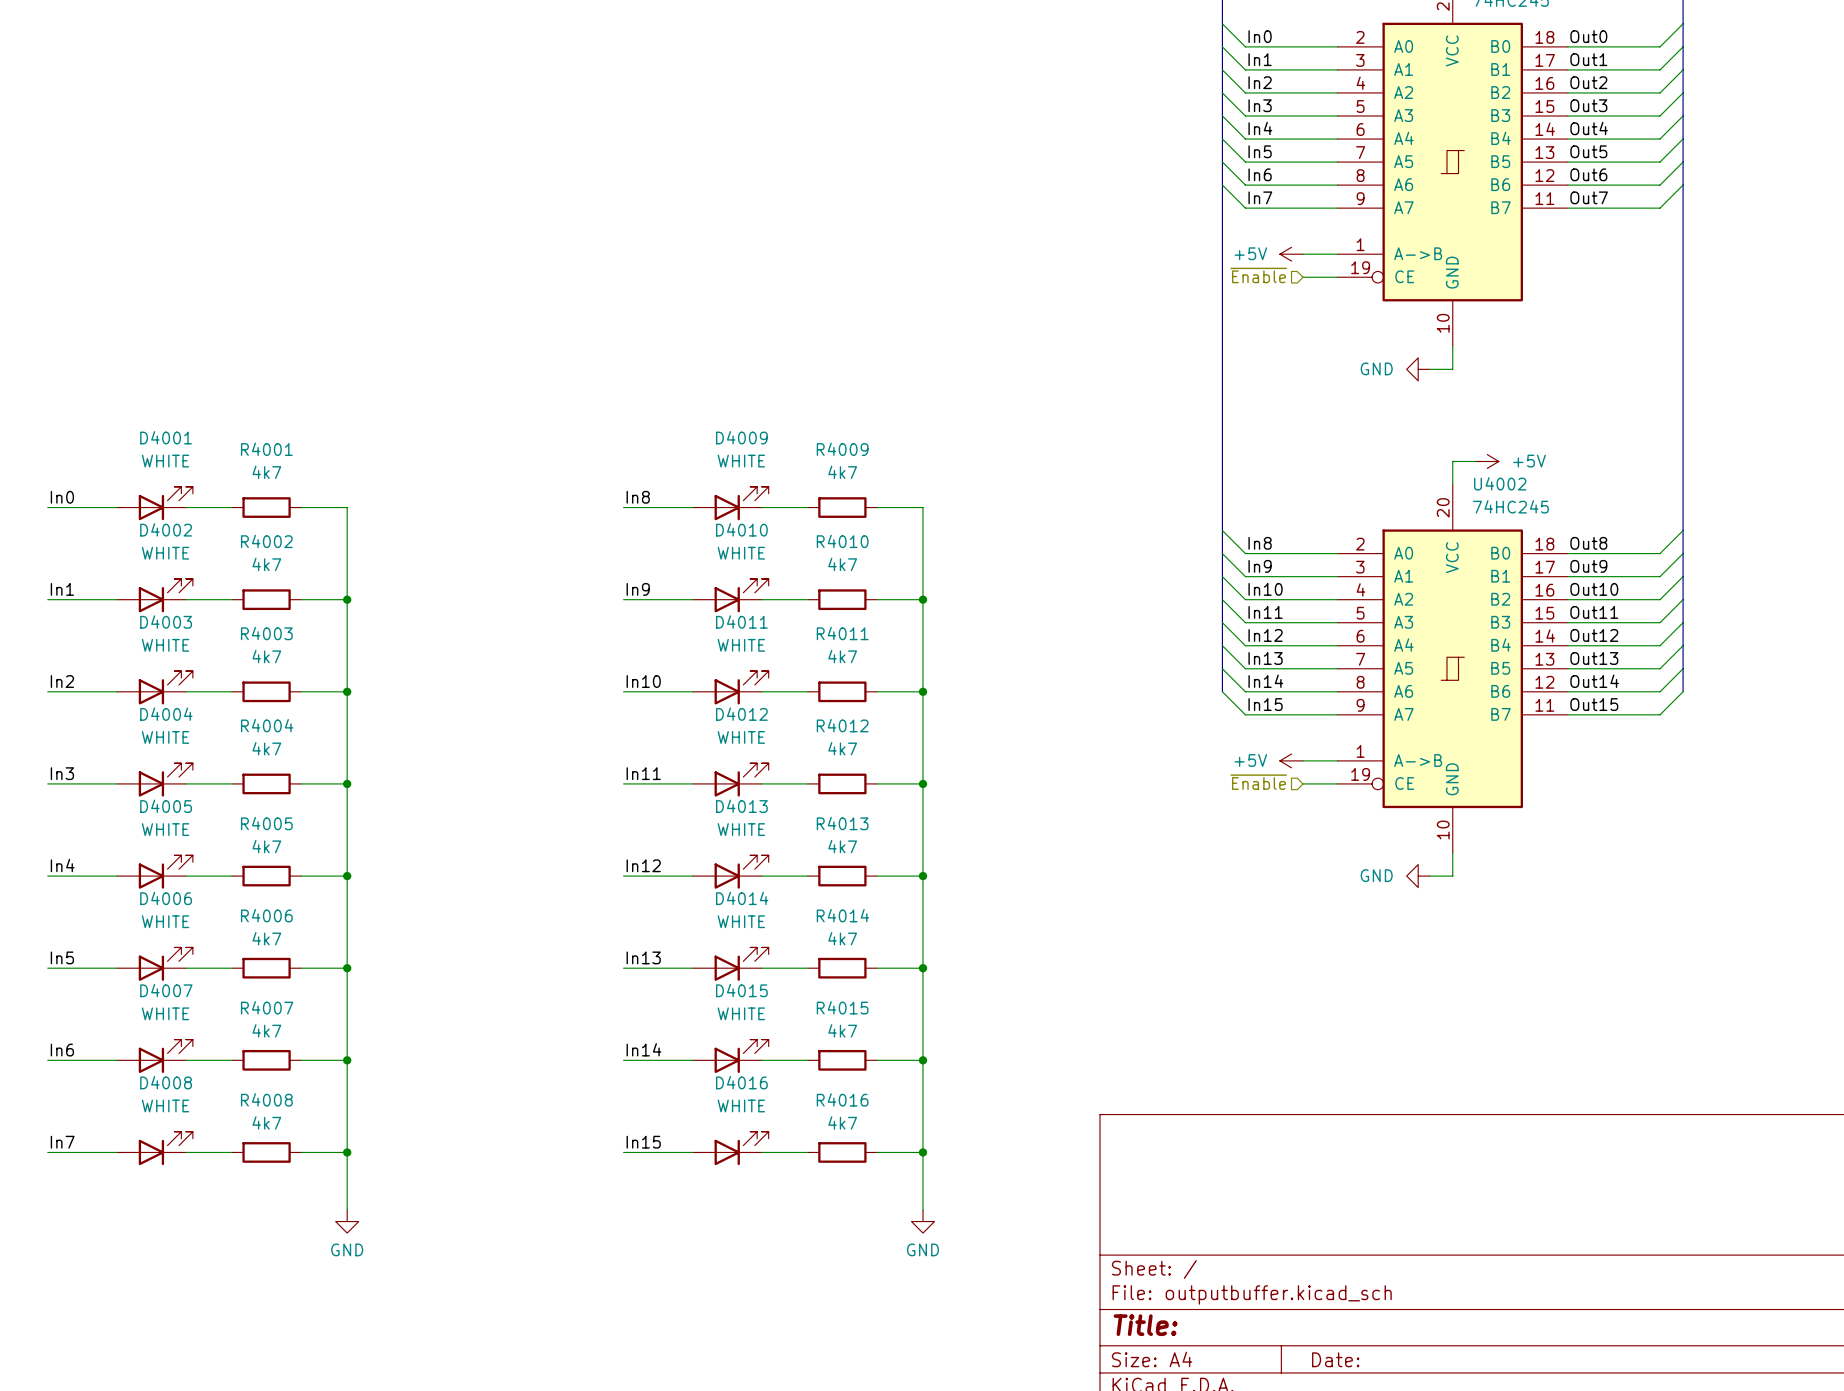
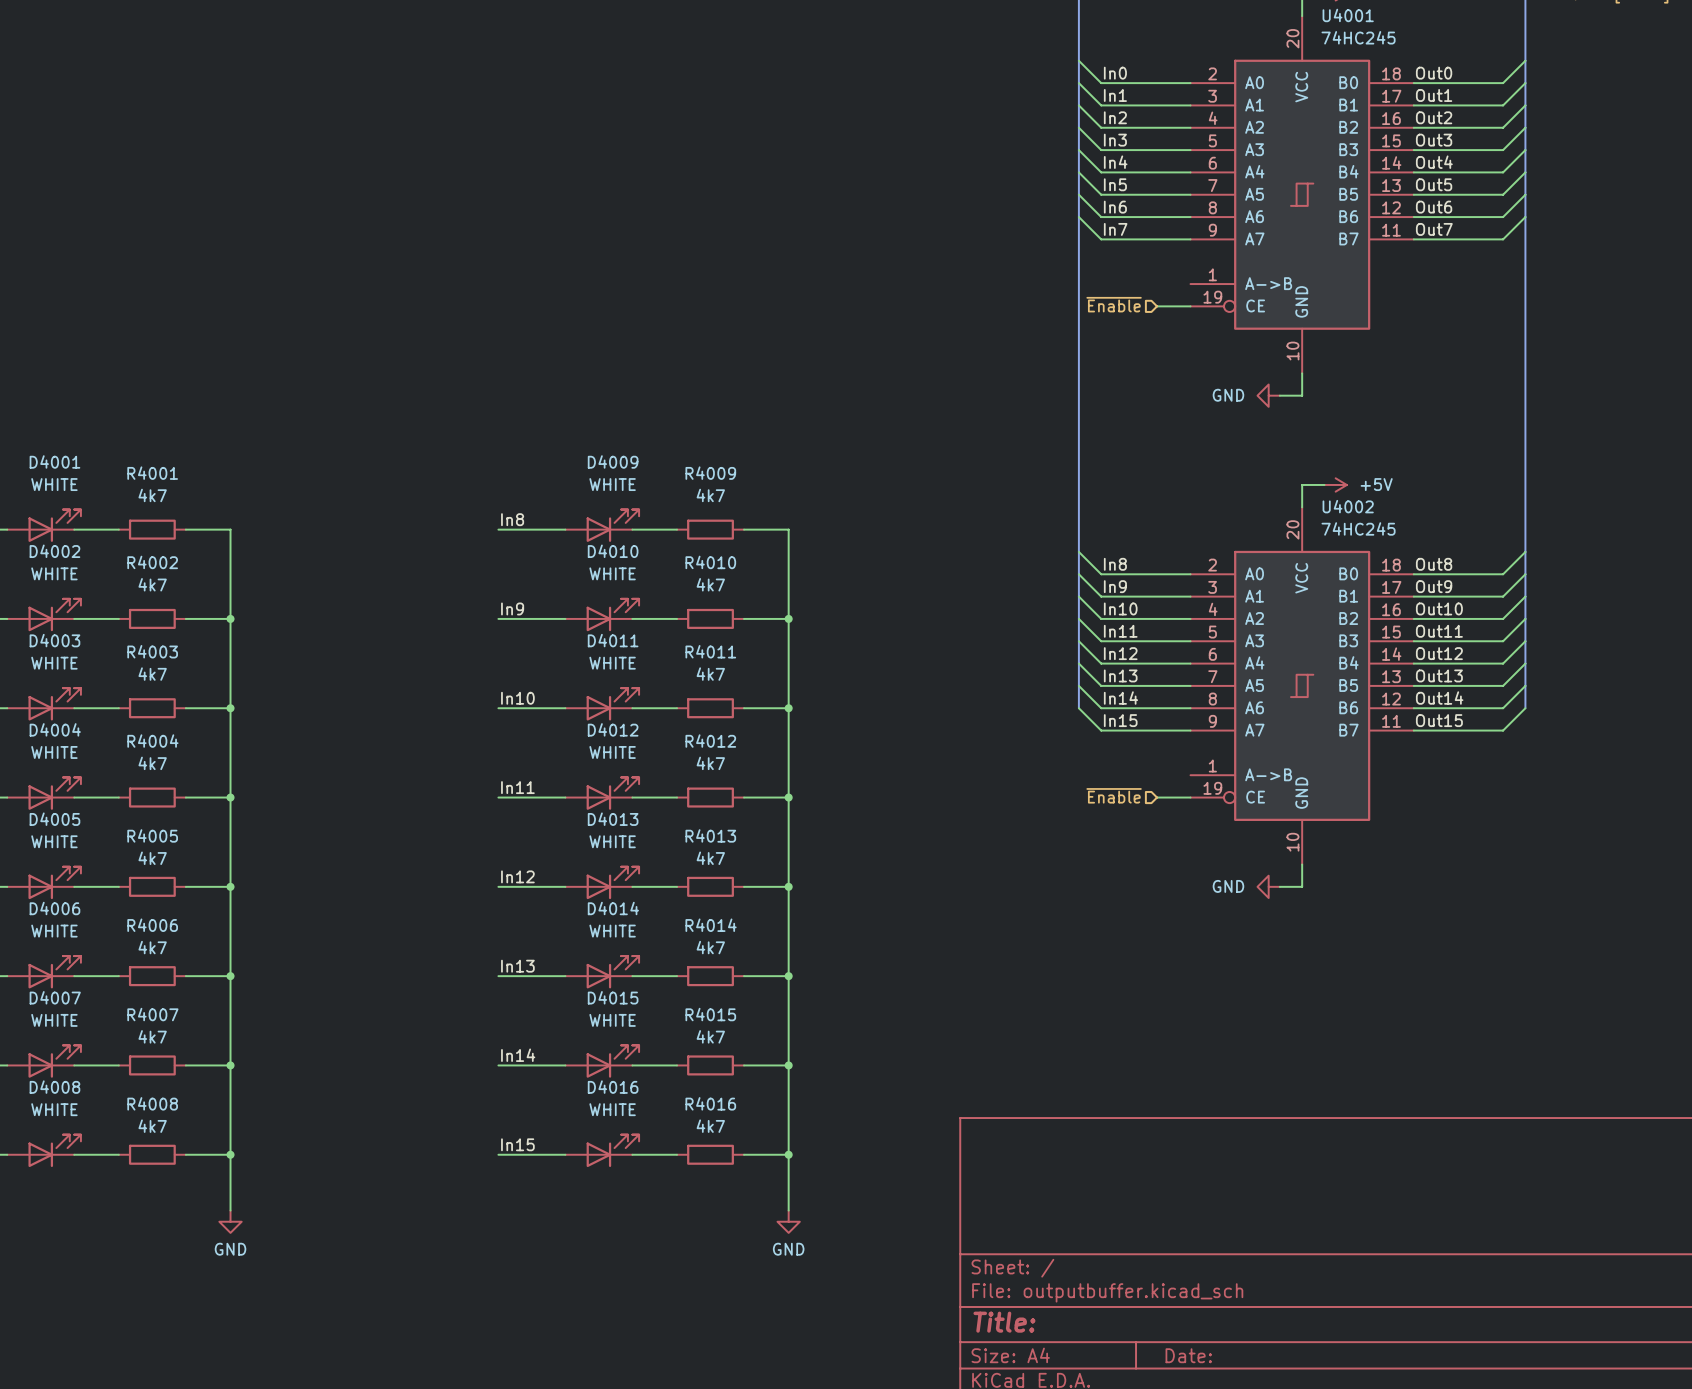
power symbol: +5V (1291, 254) -> none
wire: (1303, 254) (1337, 254) -> none
power symbol: +5V (1291, 760) -> none
wire: (1303, 760) (1337, 760) -> none

